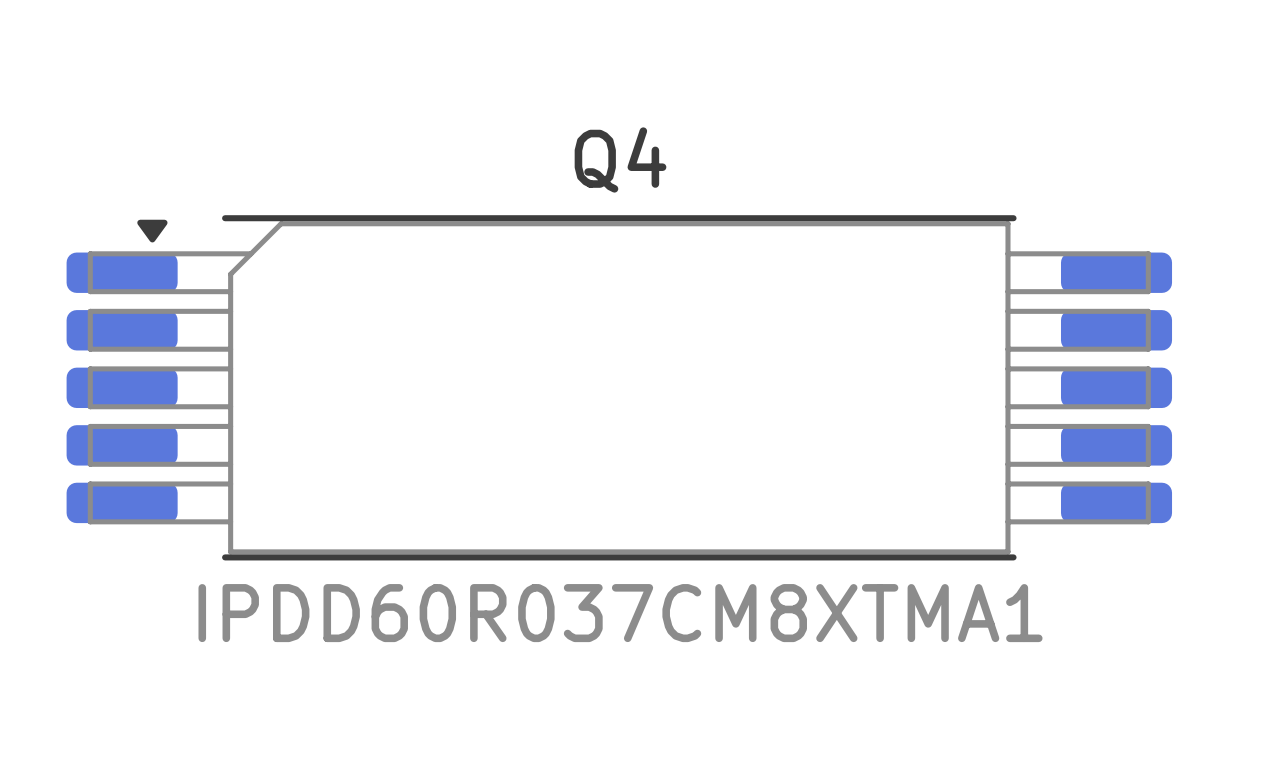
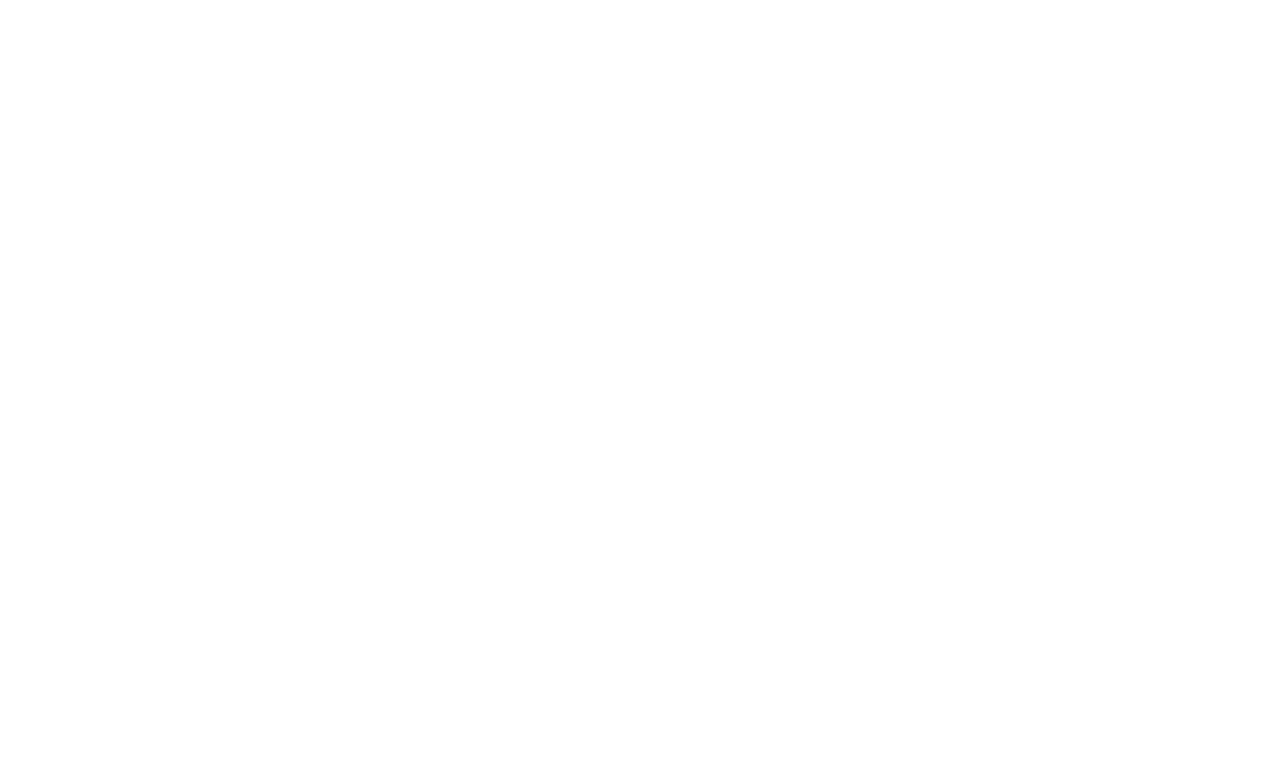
Q4: IPDD60R037CM8XTMA1 (619, 387) -> none

